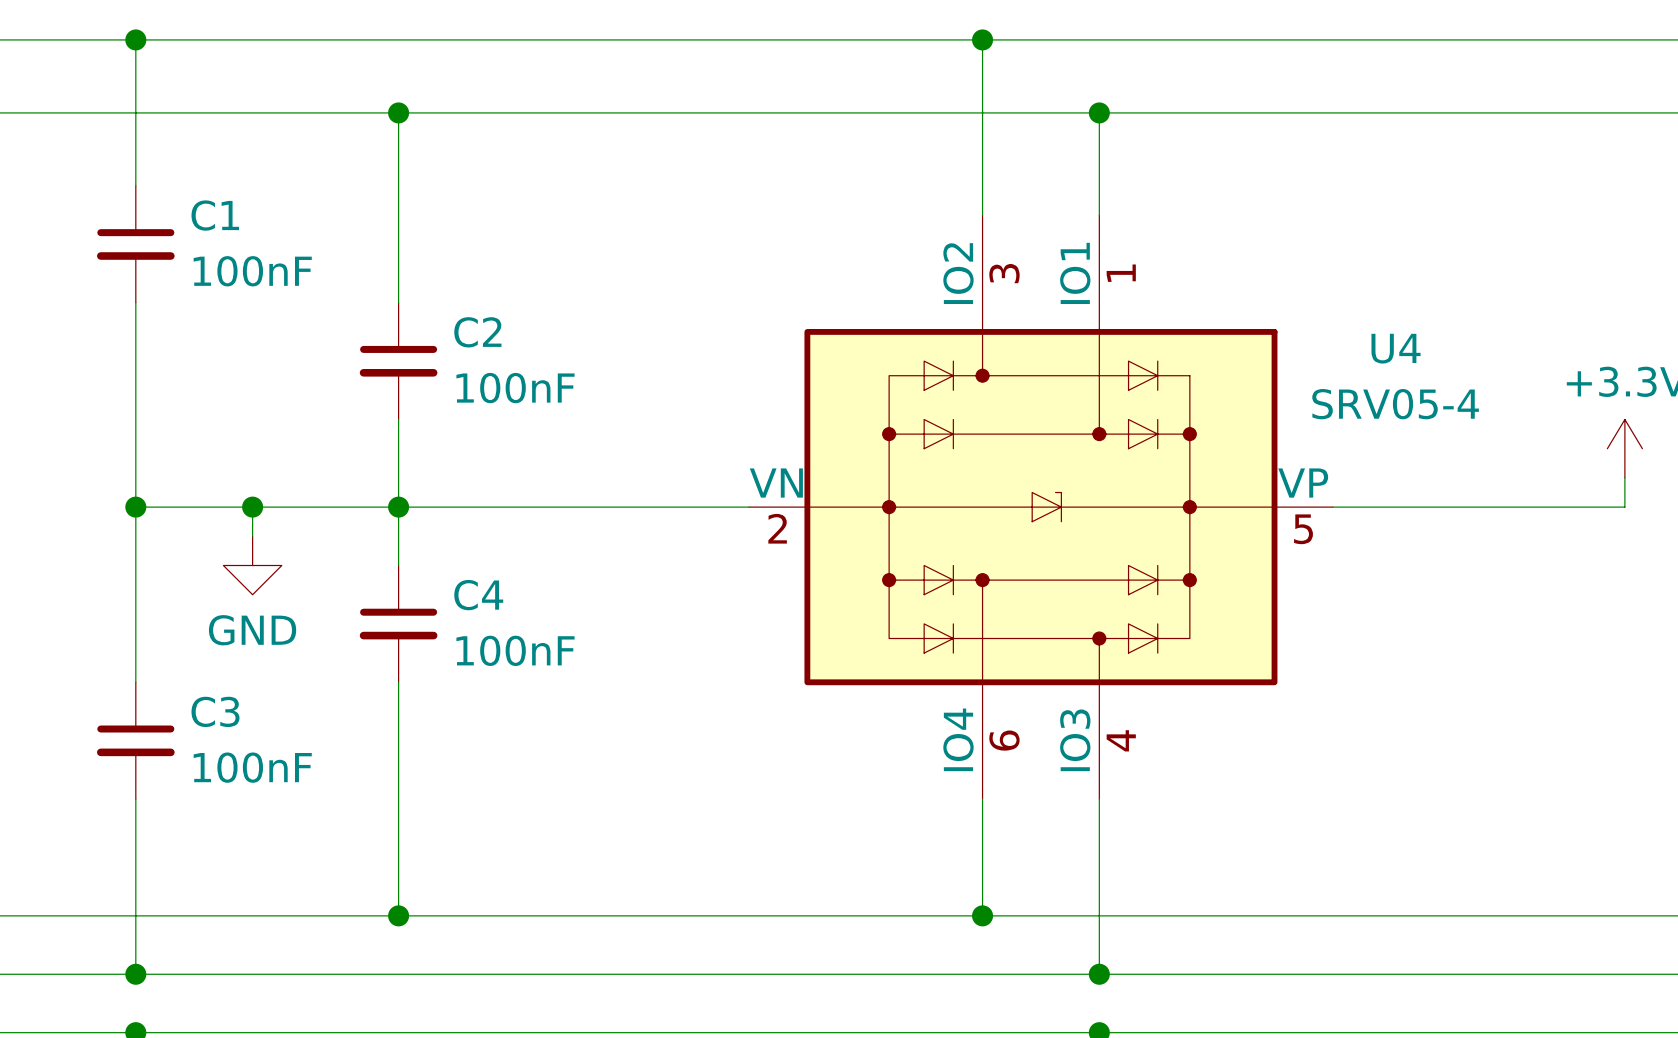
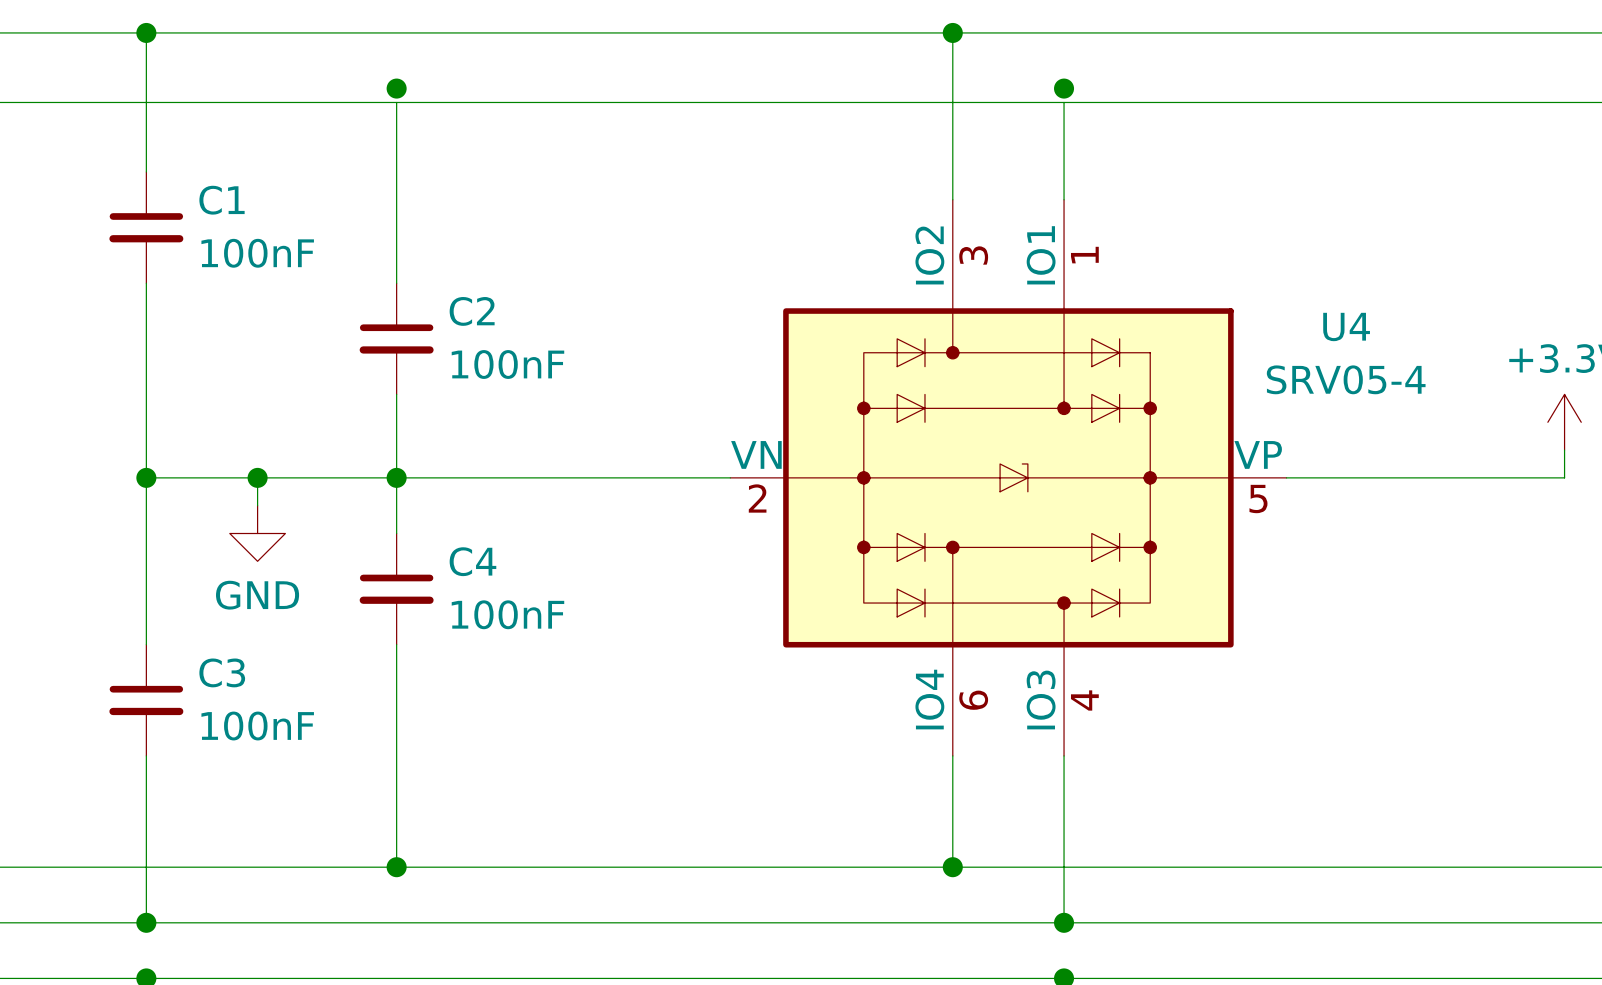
junction position: (398, 112) -> (396, 88)
junction position: (1099, 112) -> (1064, 88)

